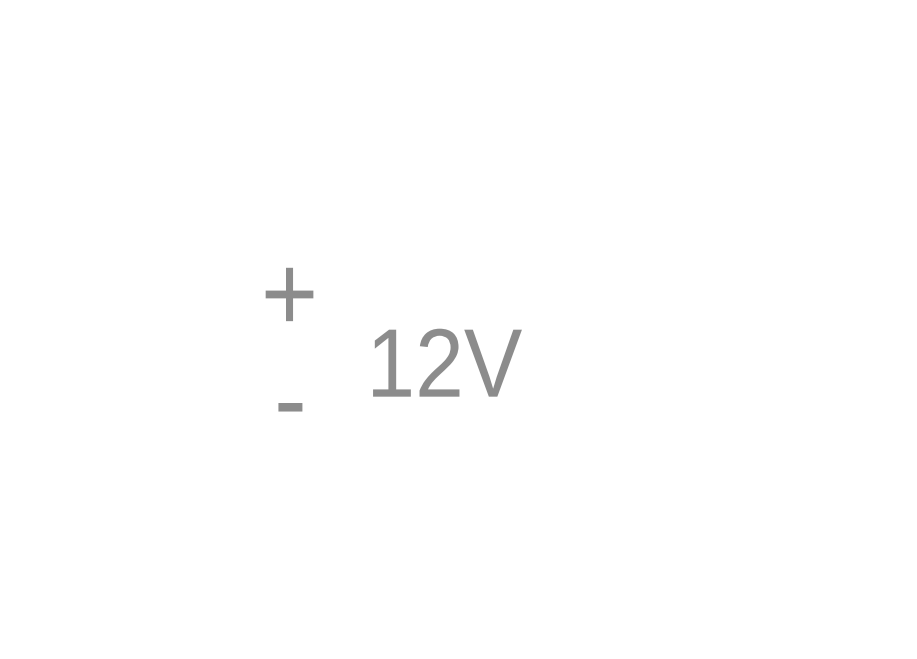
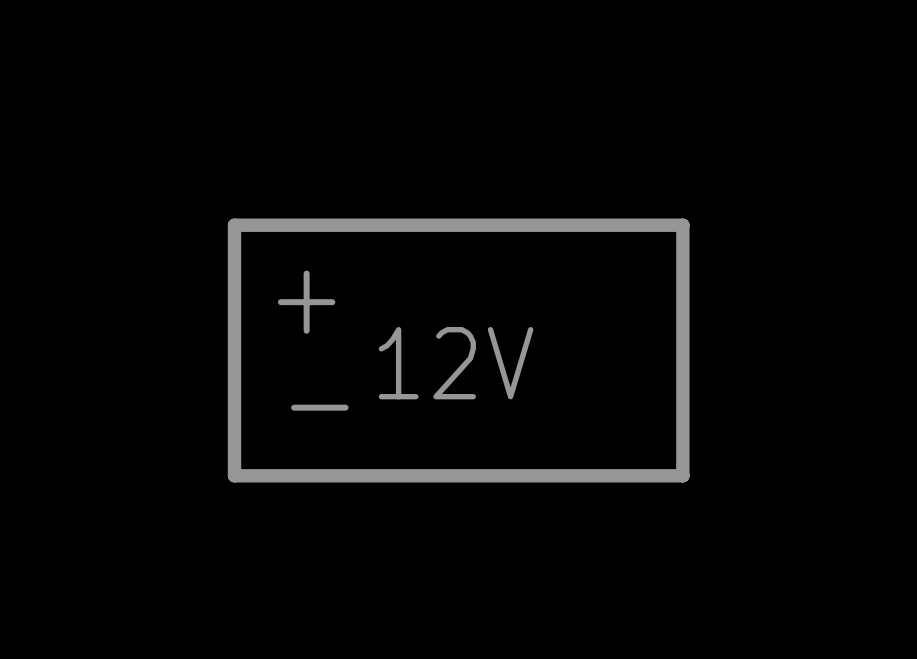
line: none -> (234, 225) (234, 475) (682, 475) (682, 225) (234, 225)

